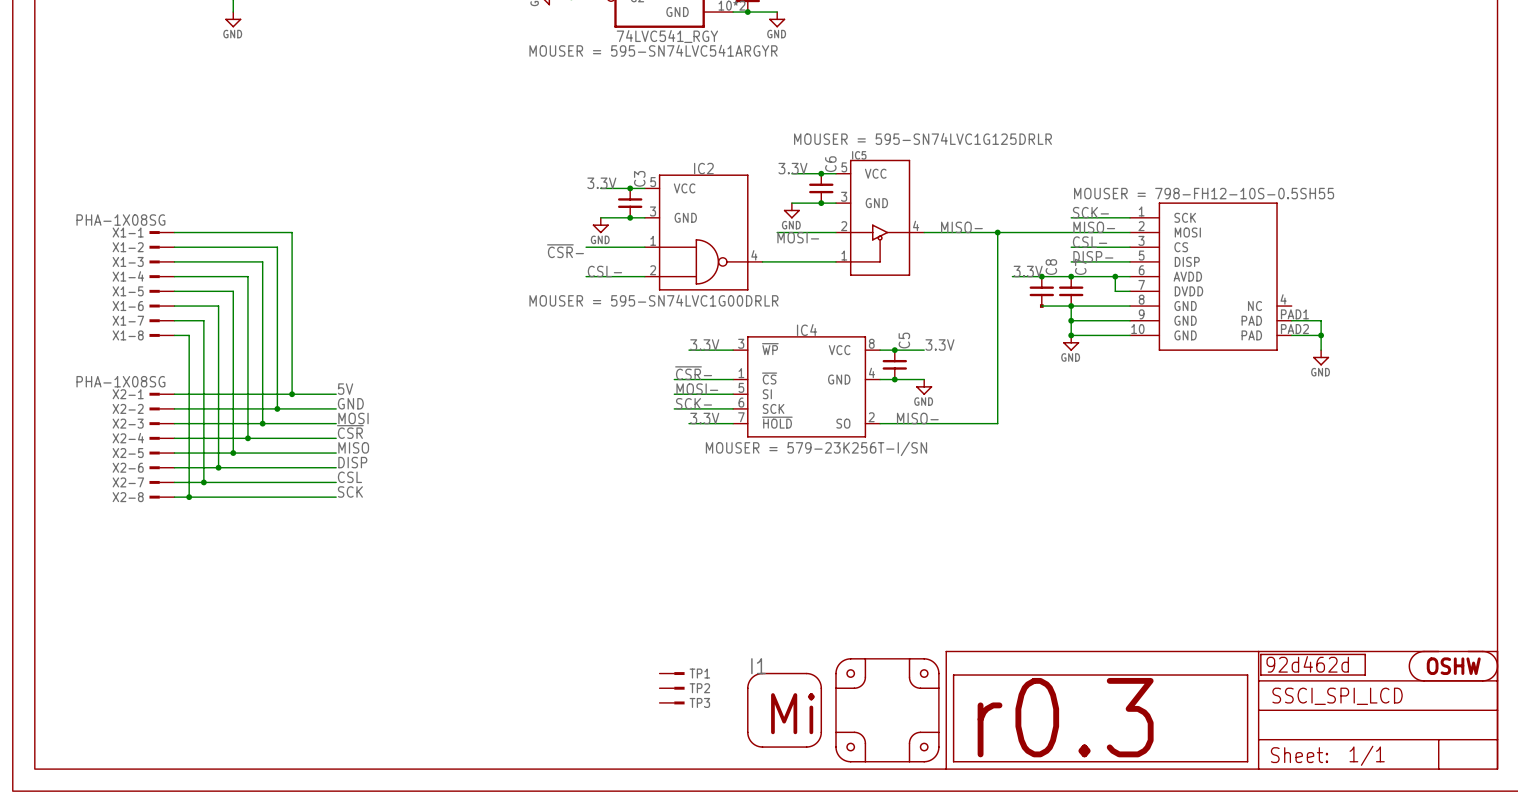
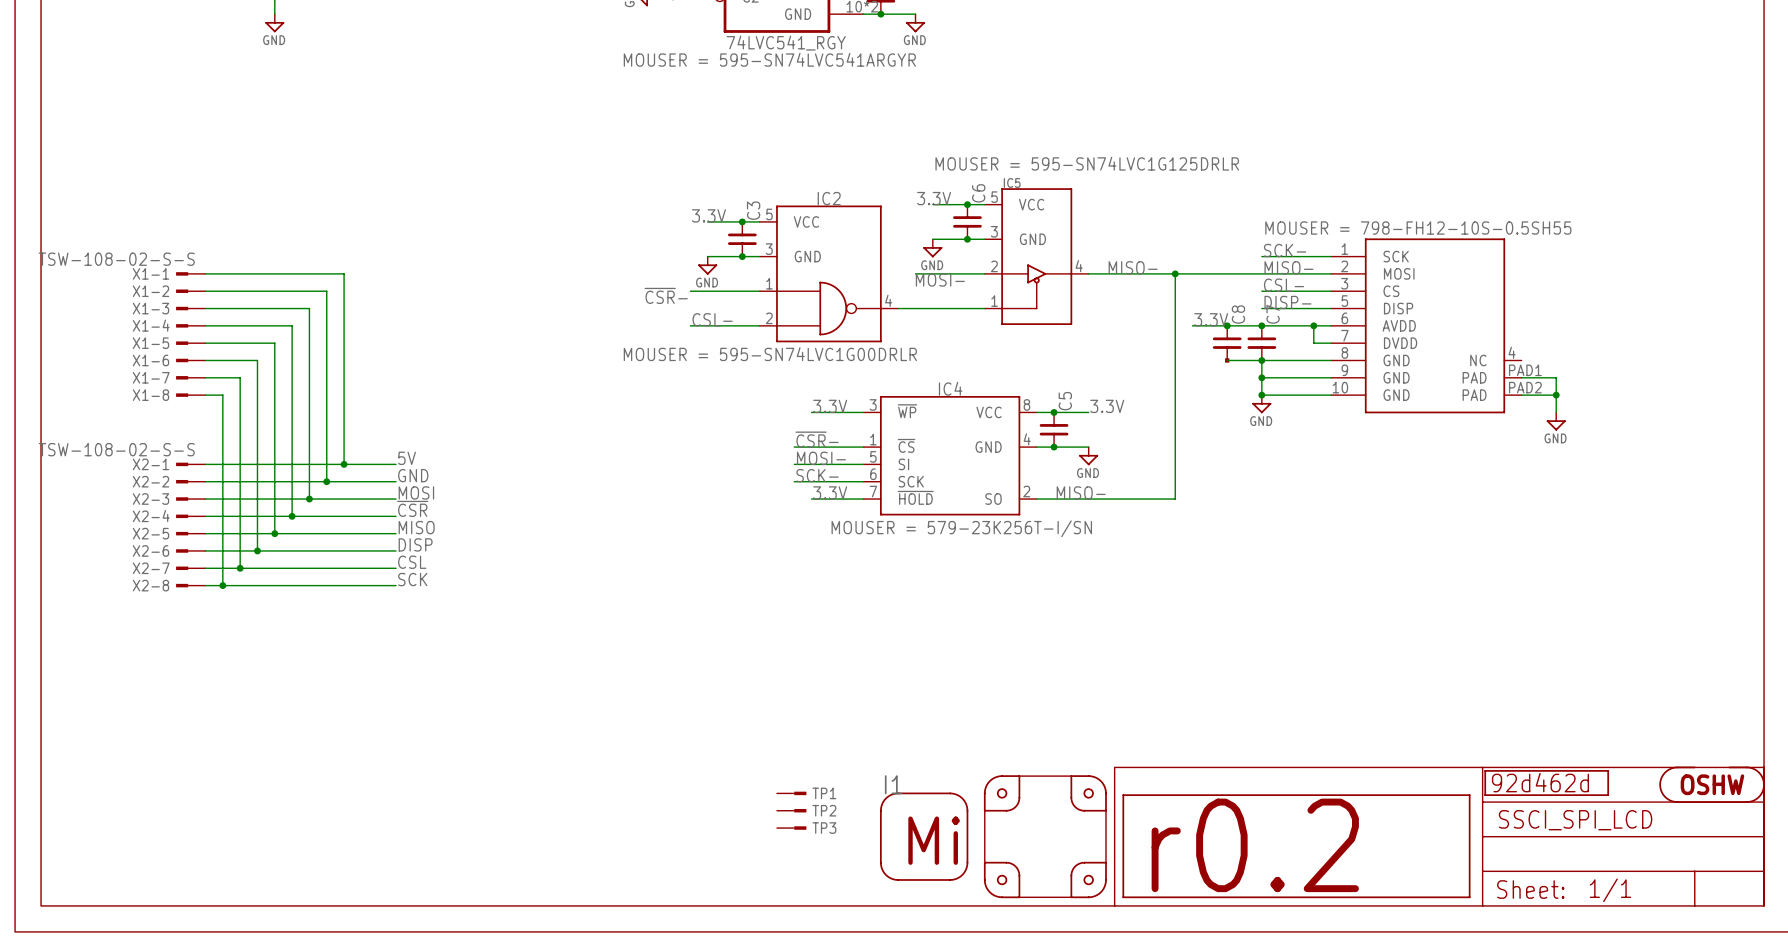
X1-1 value: PHA-1X08SG (120, 220) -> TSW-108-02-S-S (116, 259)
X2-1 value: PHA-1X08SG (120, 381) -> TSW-108-02-S-S (116, 449)
part value: r0.3 (1065, 717) -> r0.2 (1255, 845)

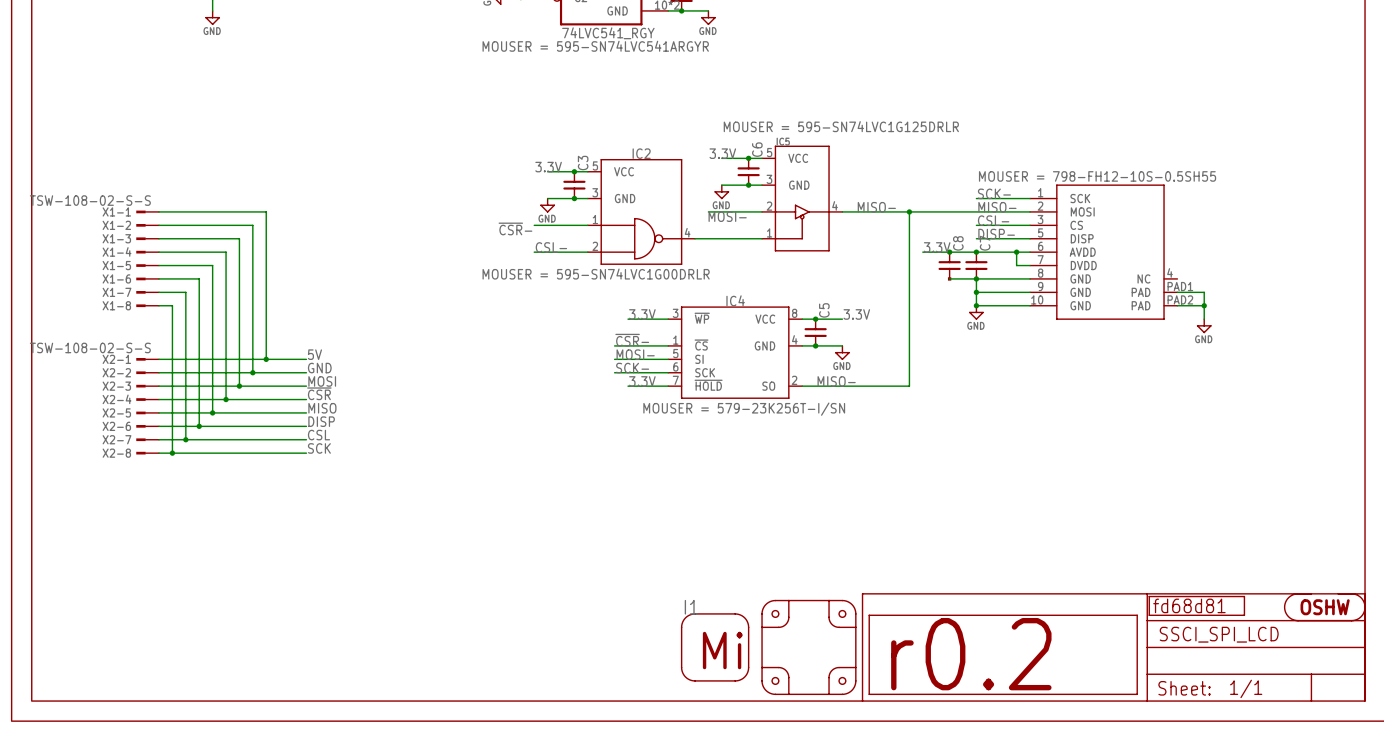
part value: 92d462d (1540, 782) -> fd68d81 (1189, 605)
TP1: (791, 793) -> none
TP2: (791, 810) -> none
TP3: (791, 828) -> none

